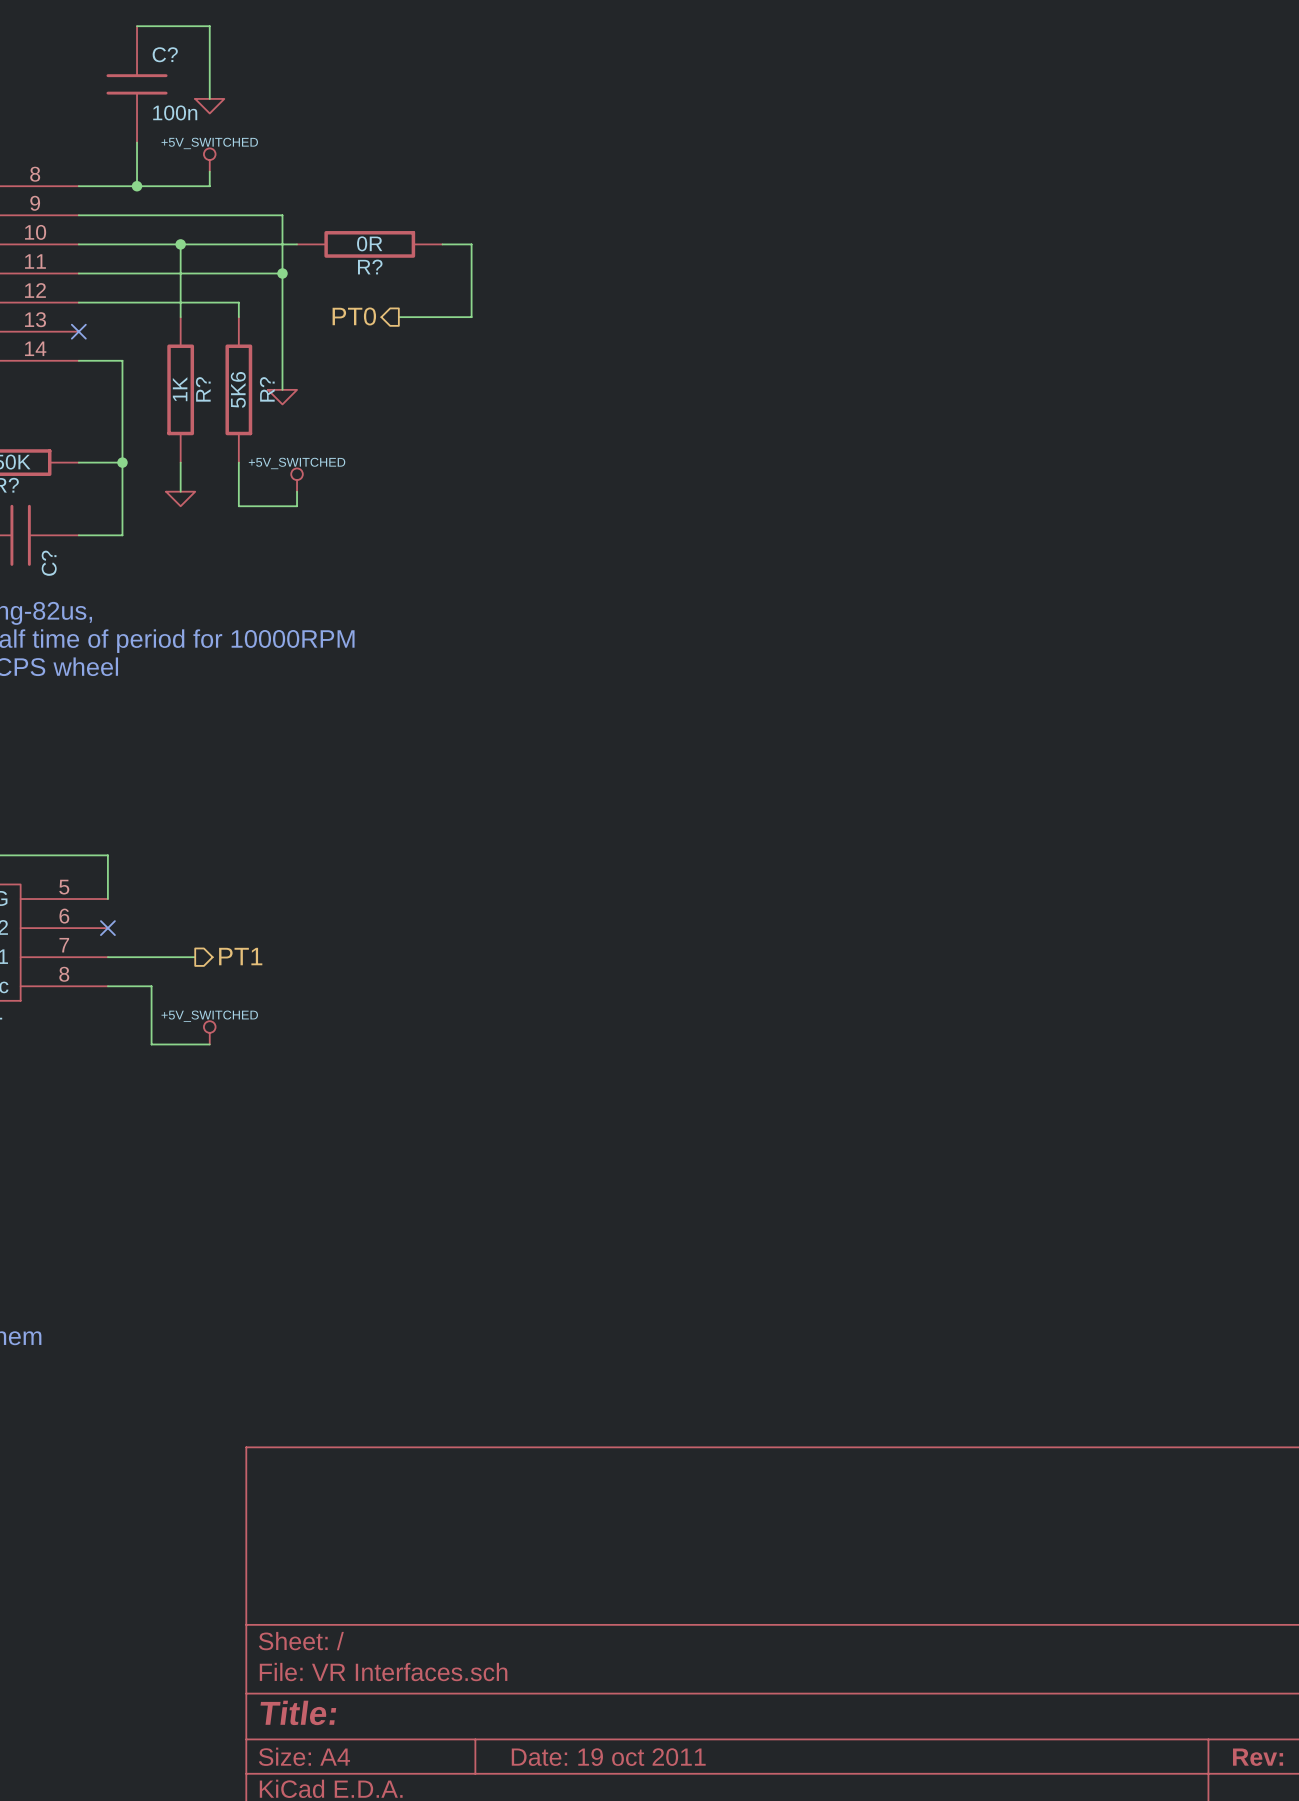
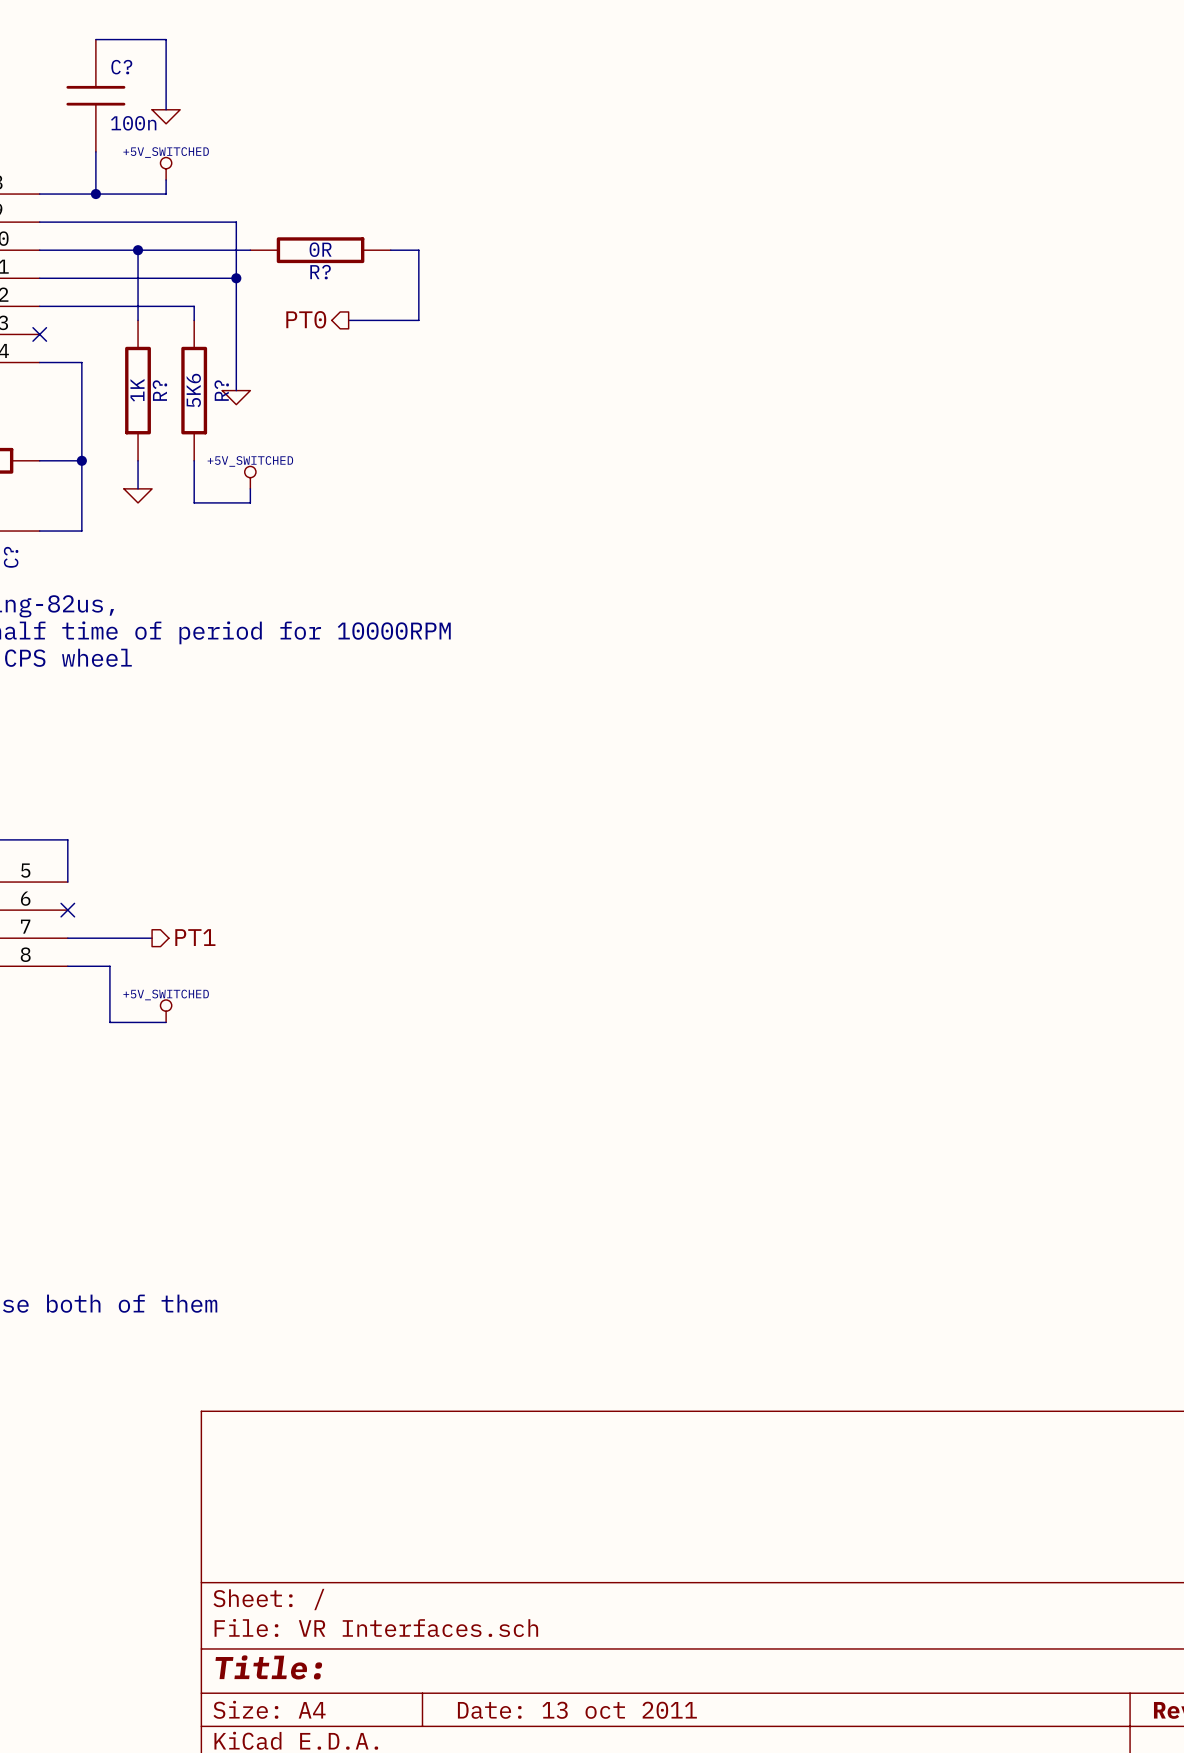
title block: Date: 19 oct 2011 (608, 1757) -> Date: 13 oct 2011 (577, 1710)

